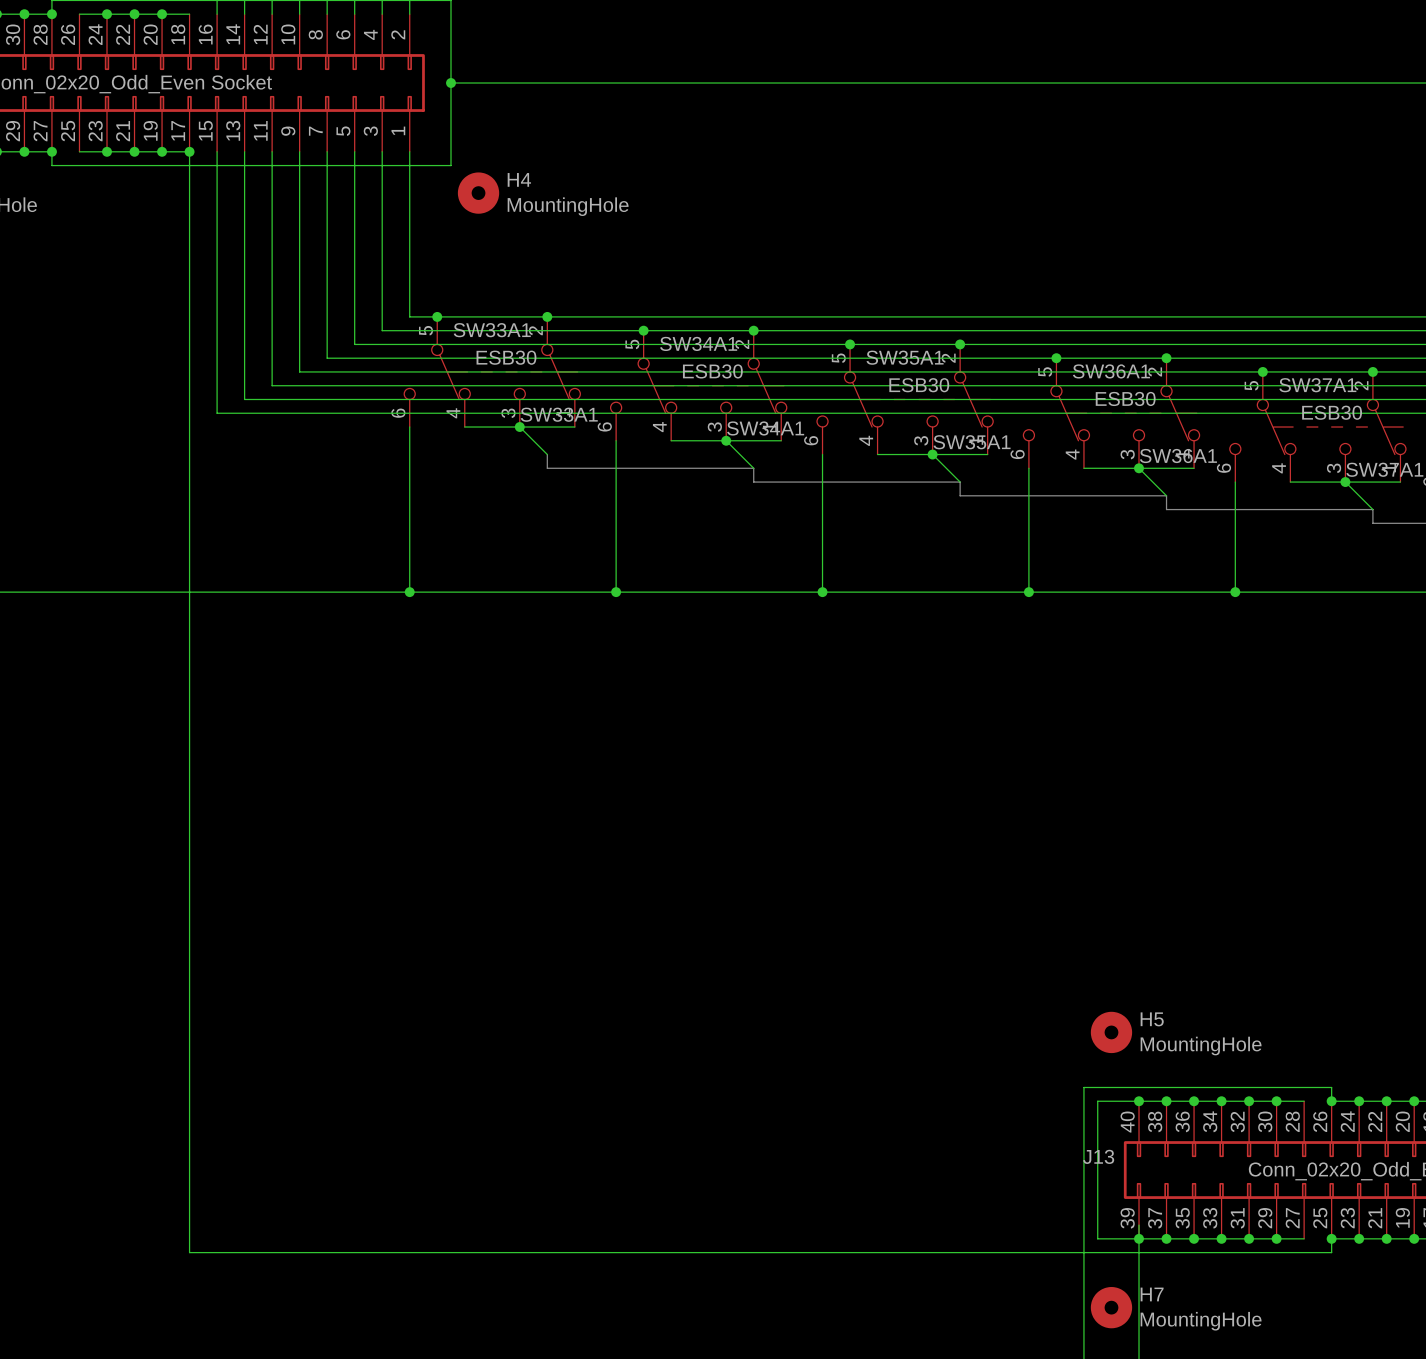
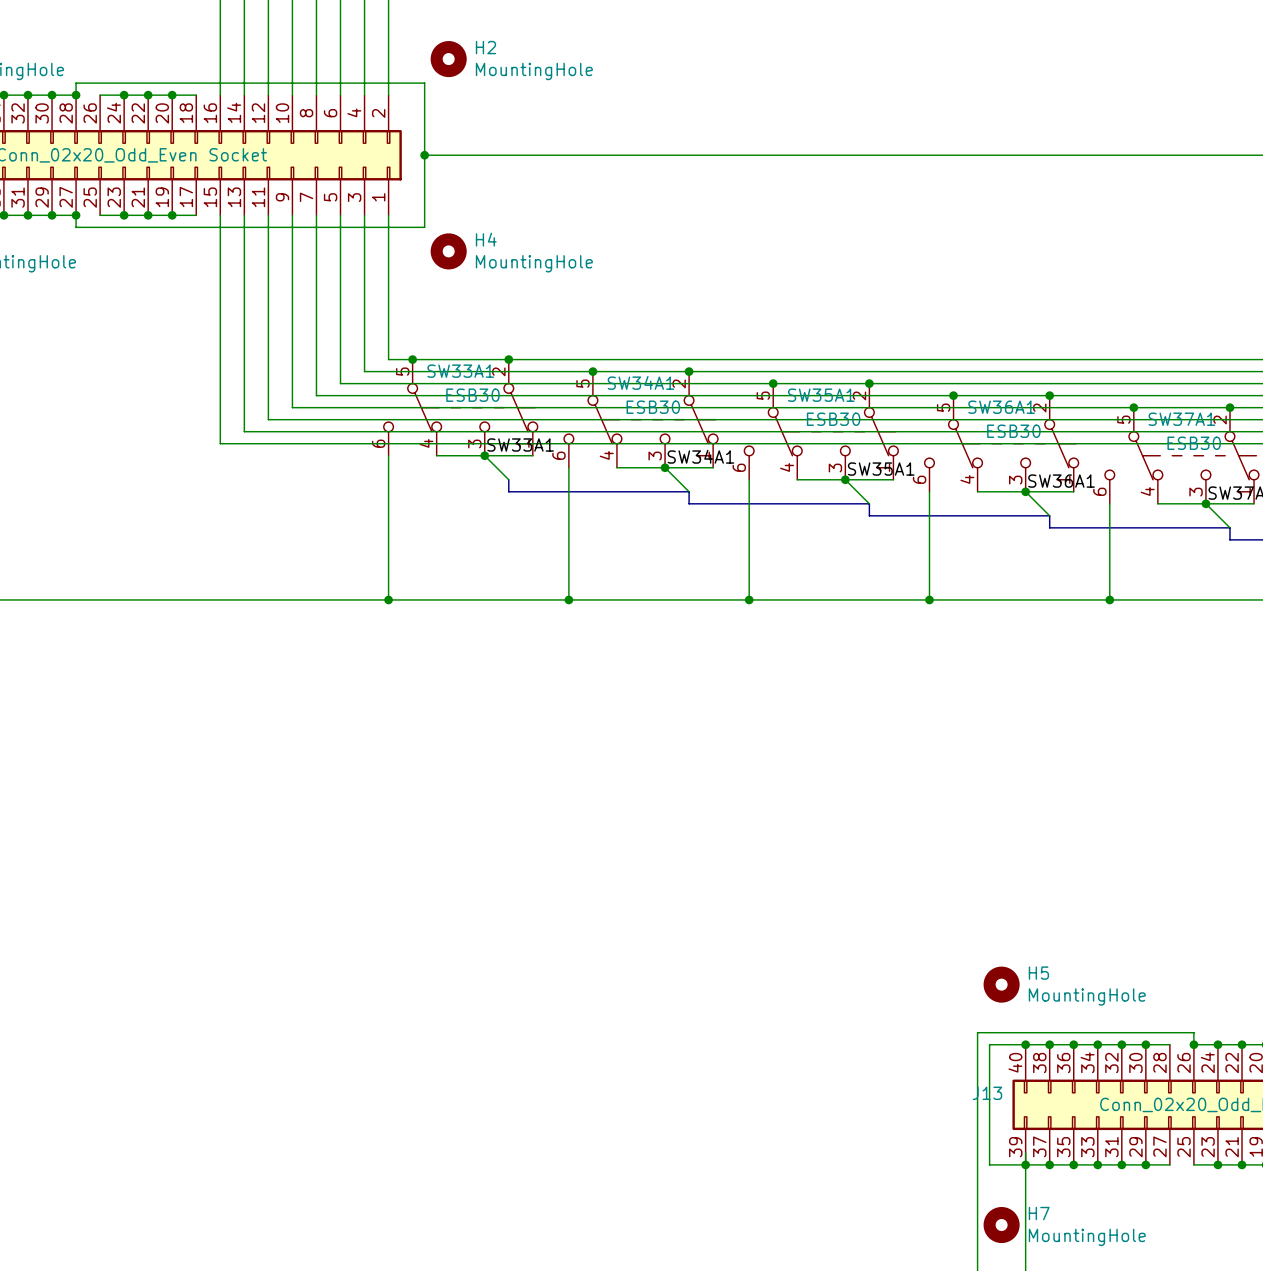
wire: (189, 151) (189, 1252) (1331, 1252) (1331, 1238) -> none
junction: (189, 151) -> none
junction: (1331, 1238) -> none

